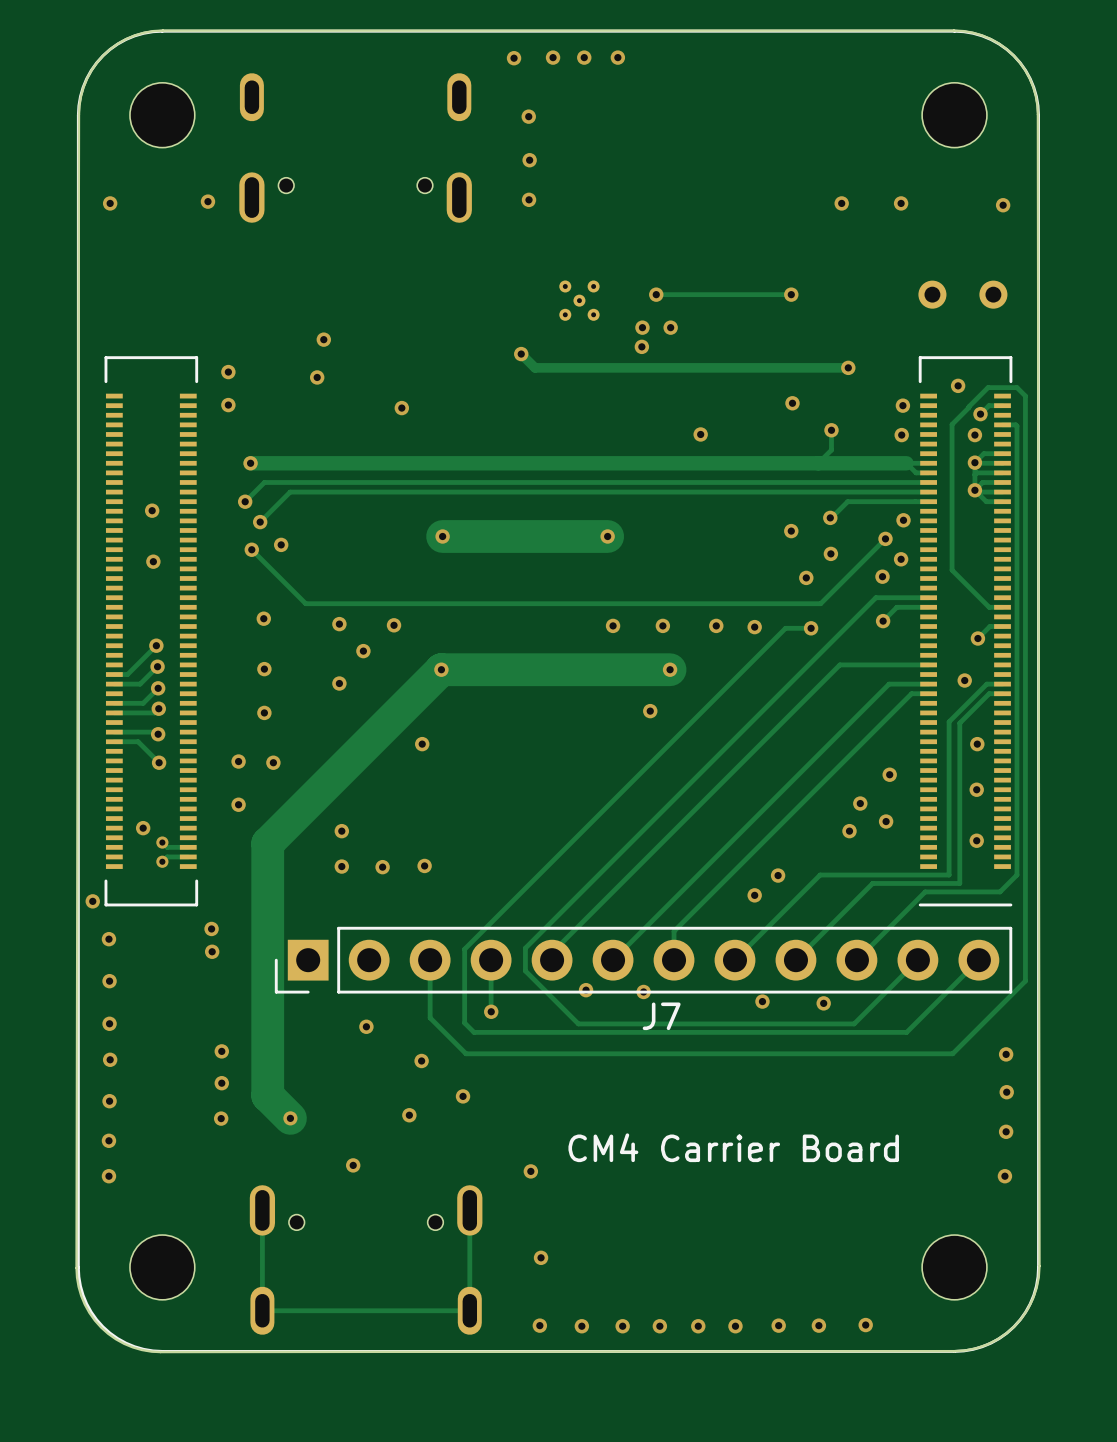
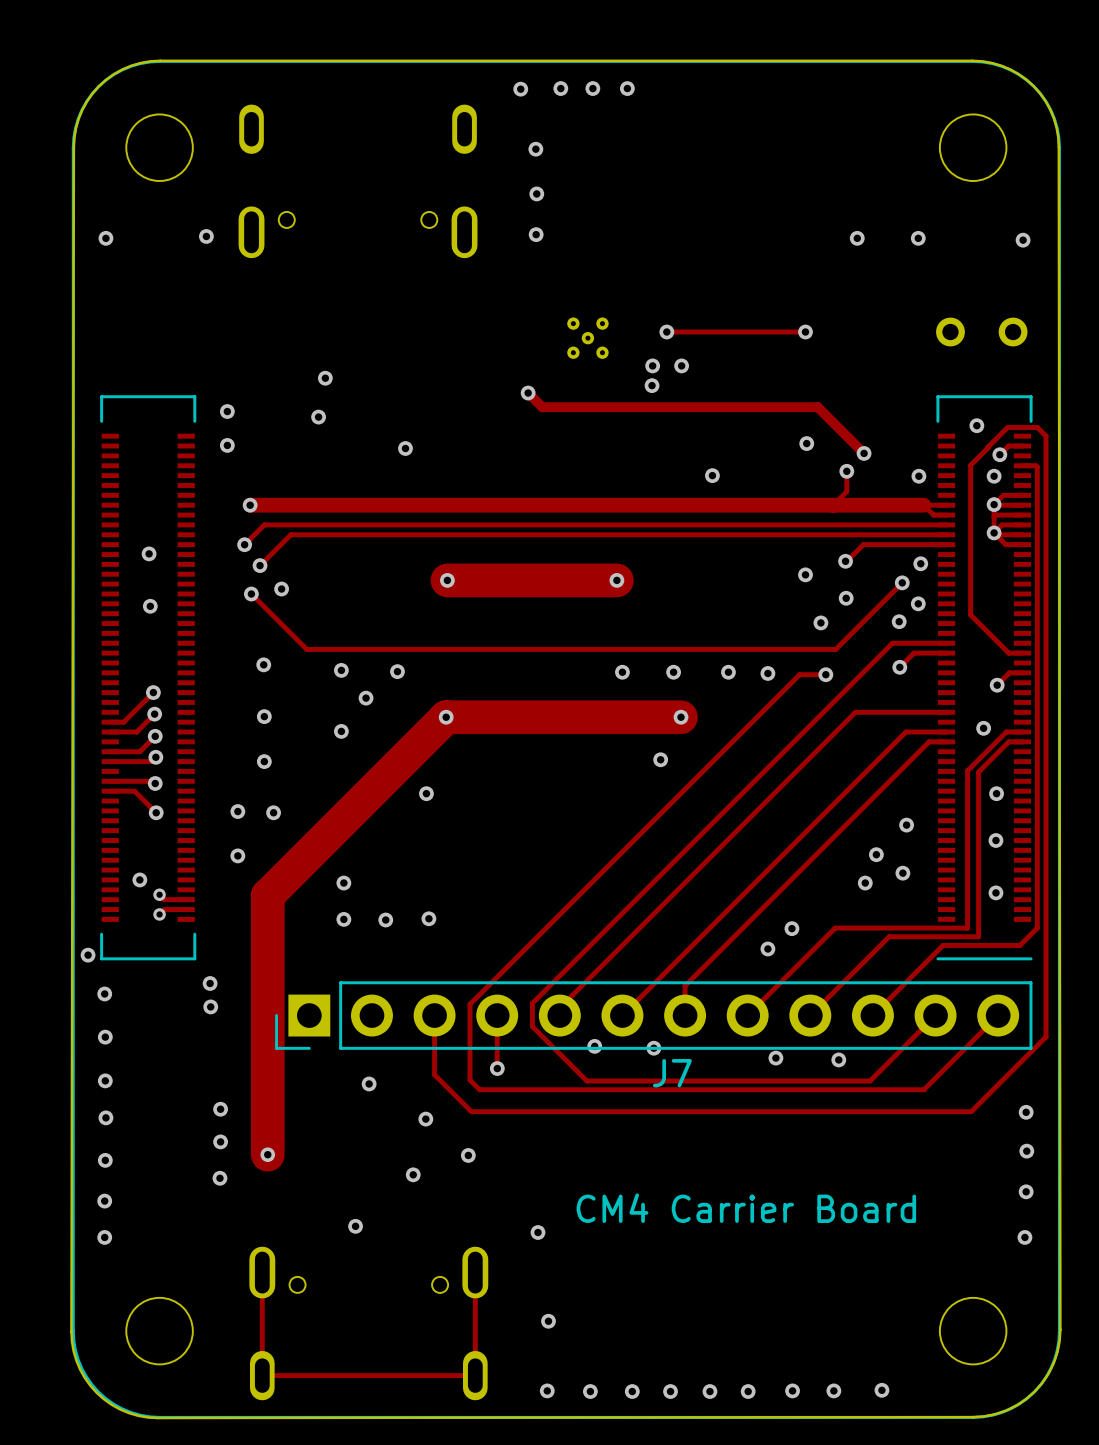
track: (803, 367) (848, 367) -> (817, 407) (864, 453)
via: (848, 367) -> none
via: (902, 405) -> none
via: none -> (864, 453)
track: (267, 1095) (290, 1118) -> none
via position: (290, 1118) -> (267, 1154)

